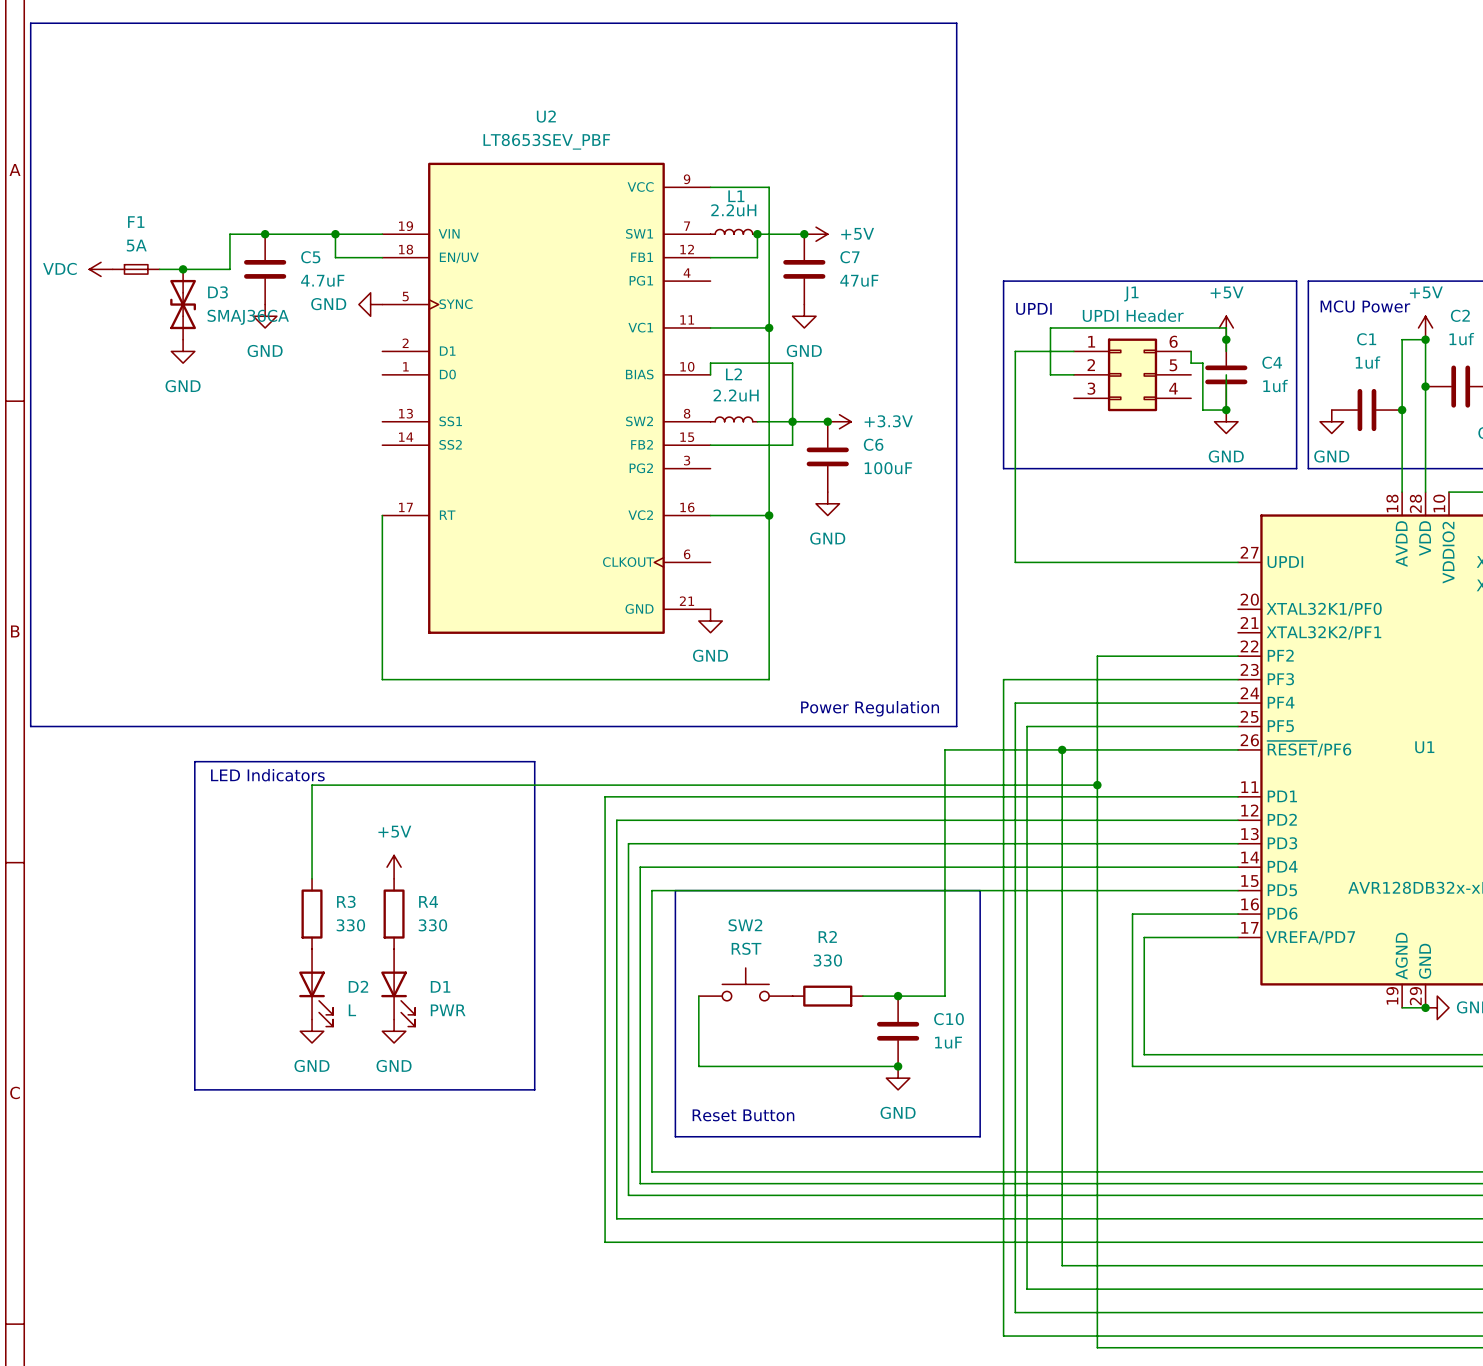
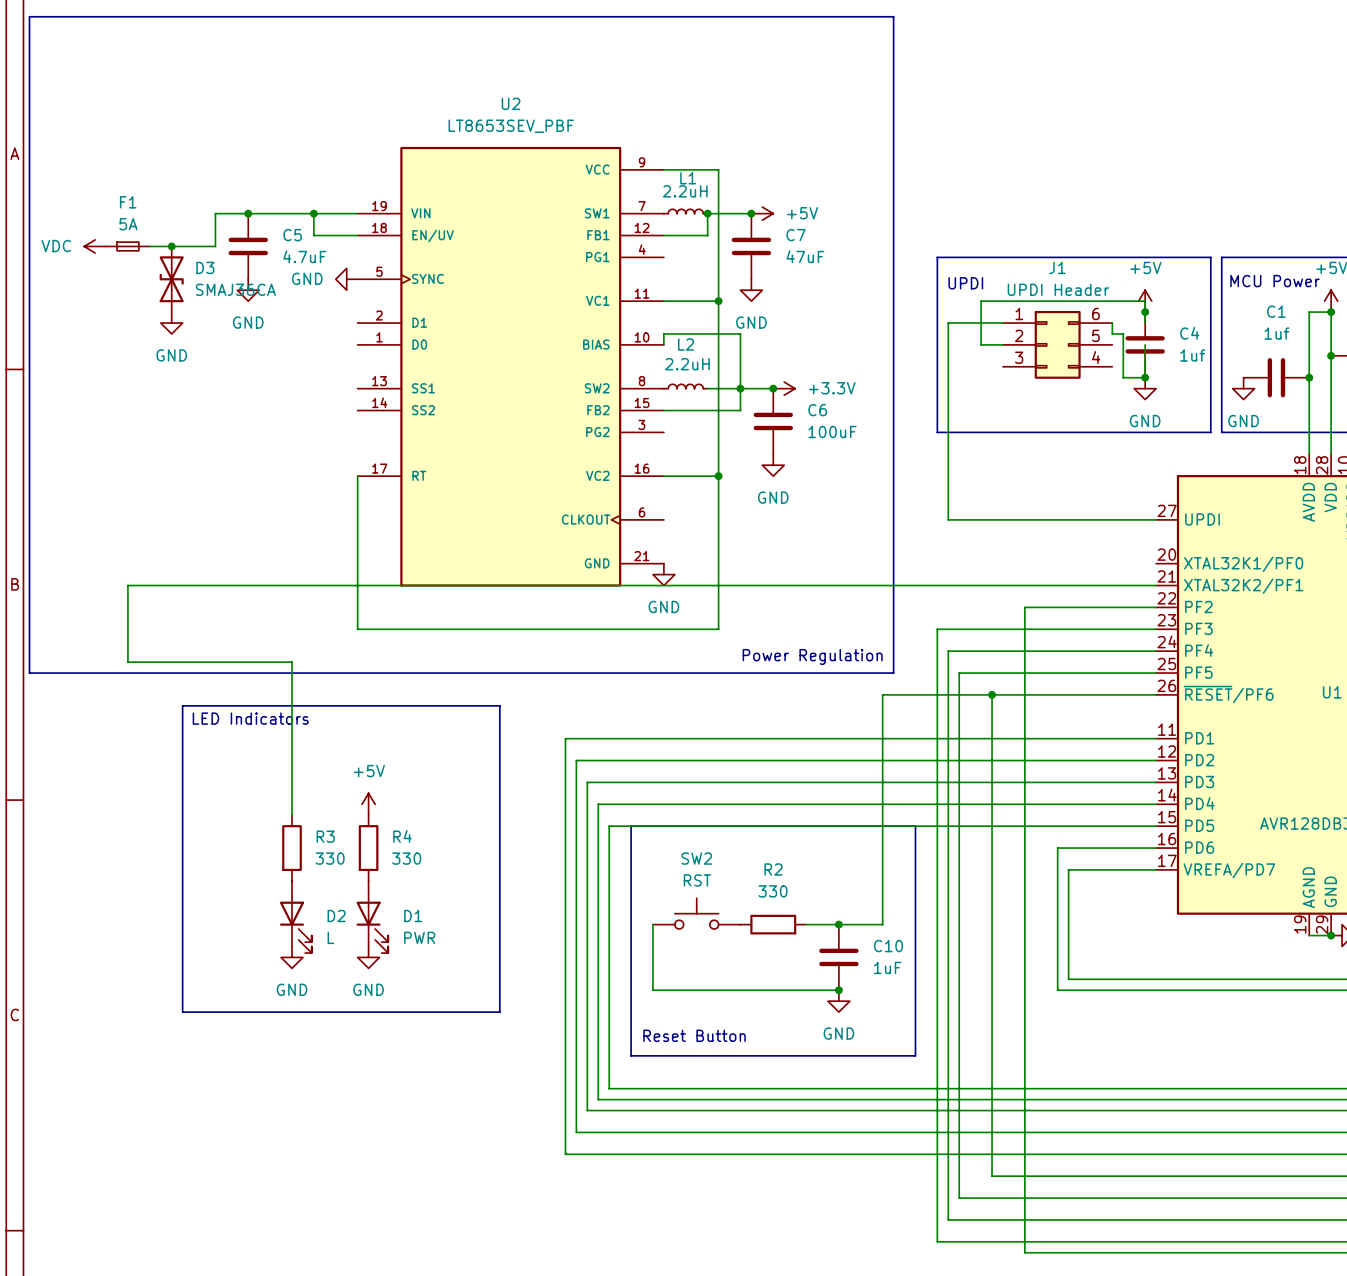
wire: (312, 785) (1097, 785) -> (292, 727) (292, 662) (127, 662) (127, 585) (1156, 585)
junction: (1097, 785) -> none

